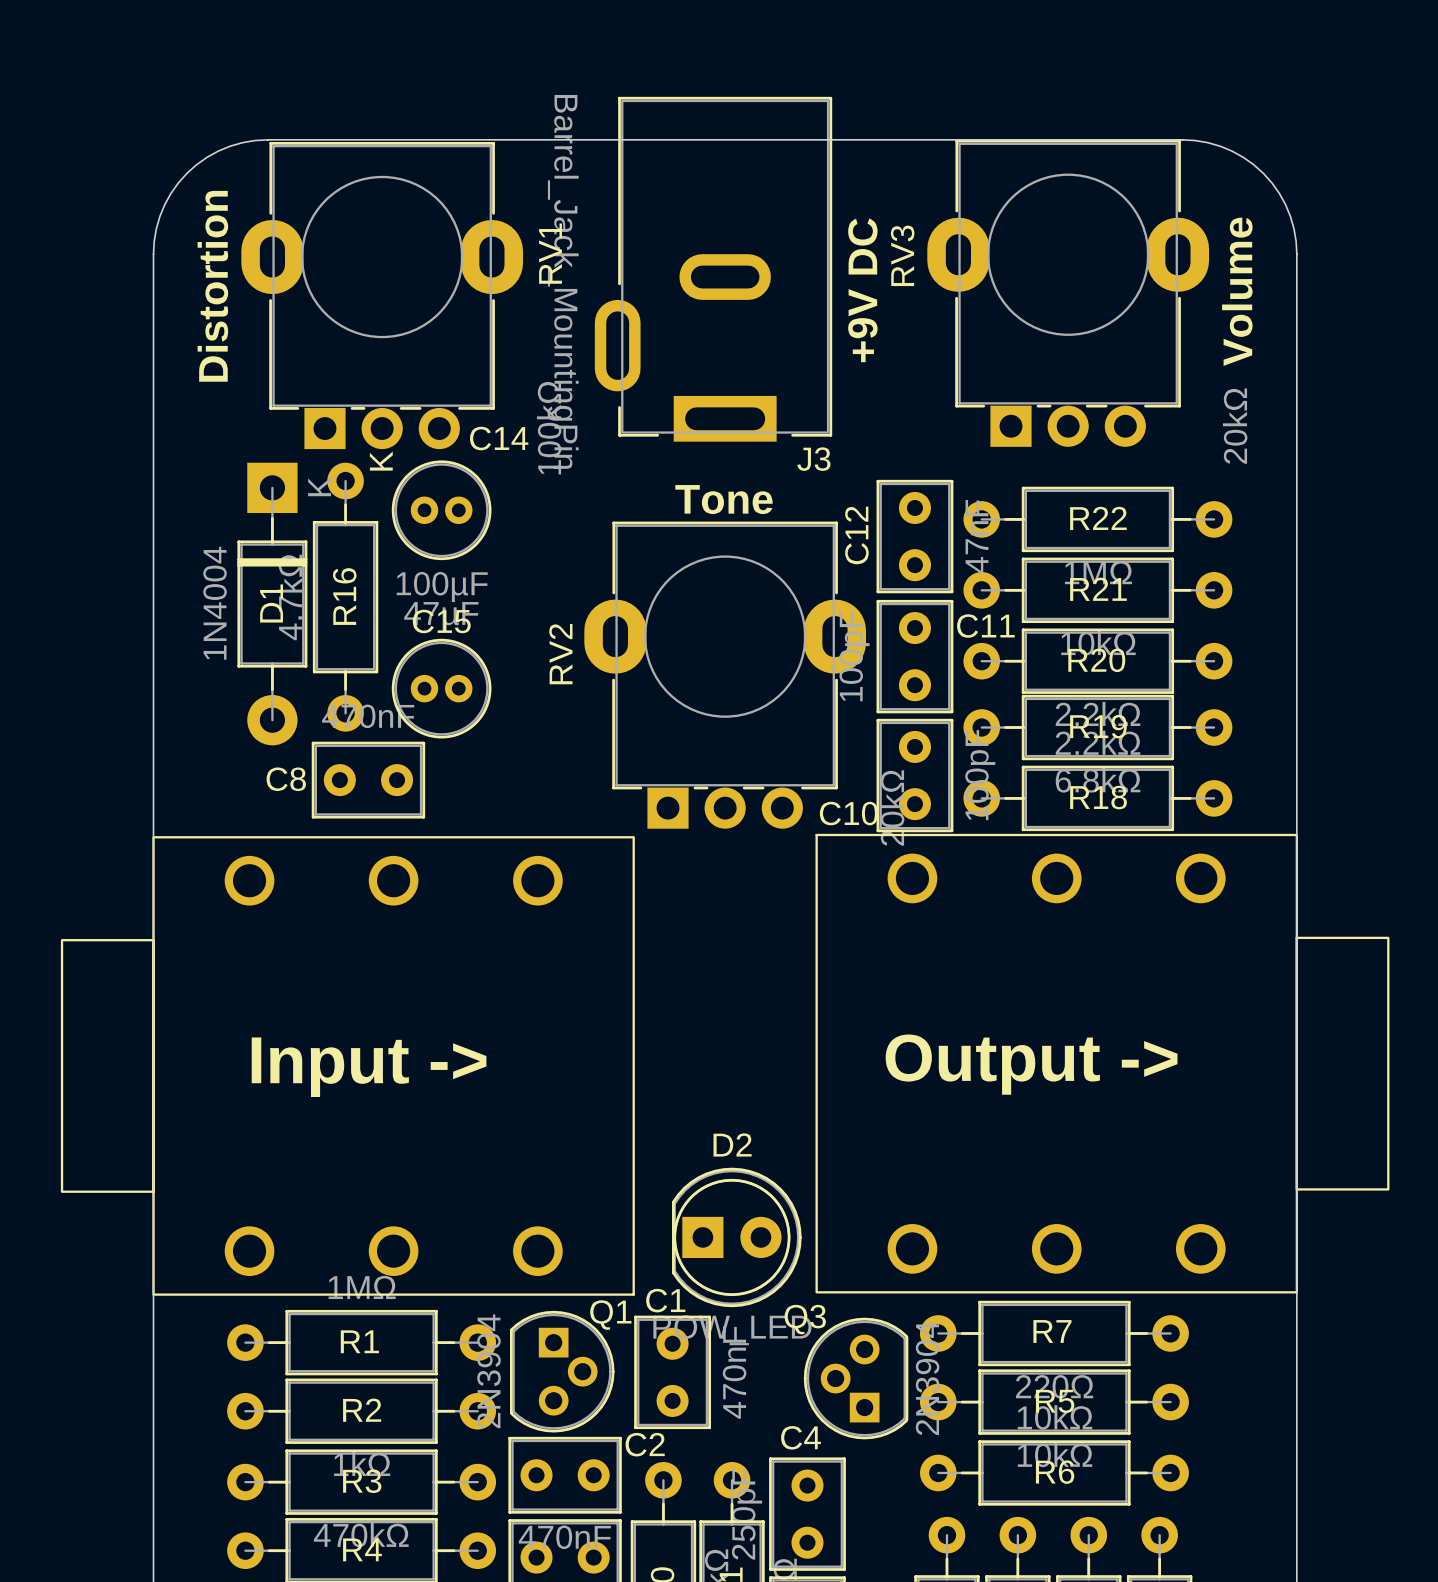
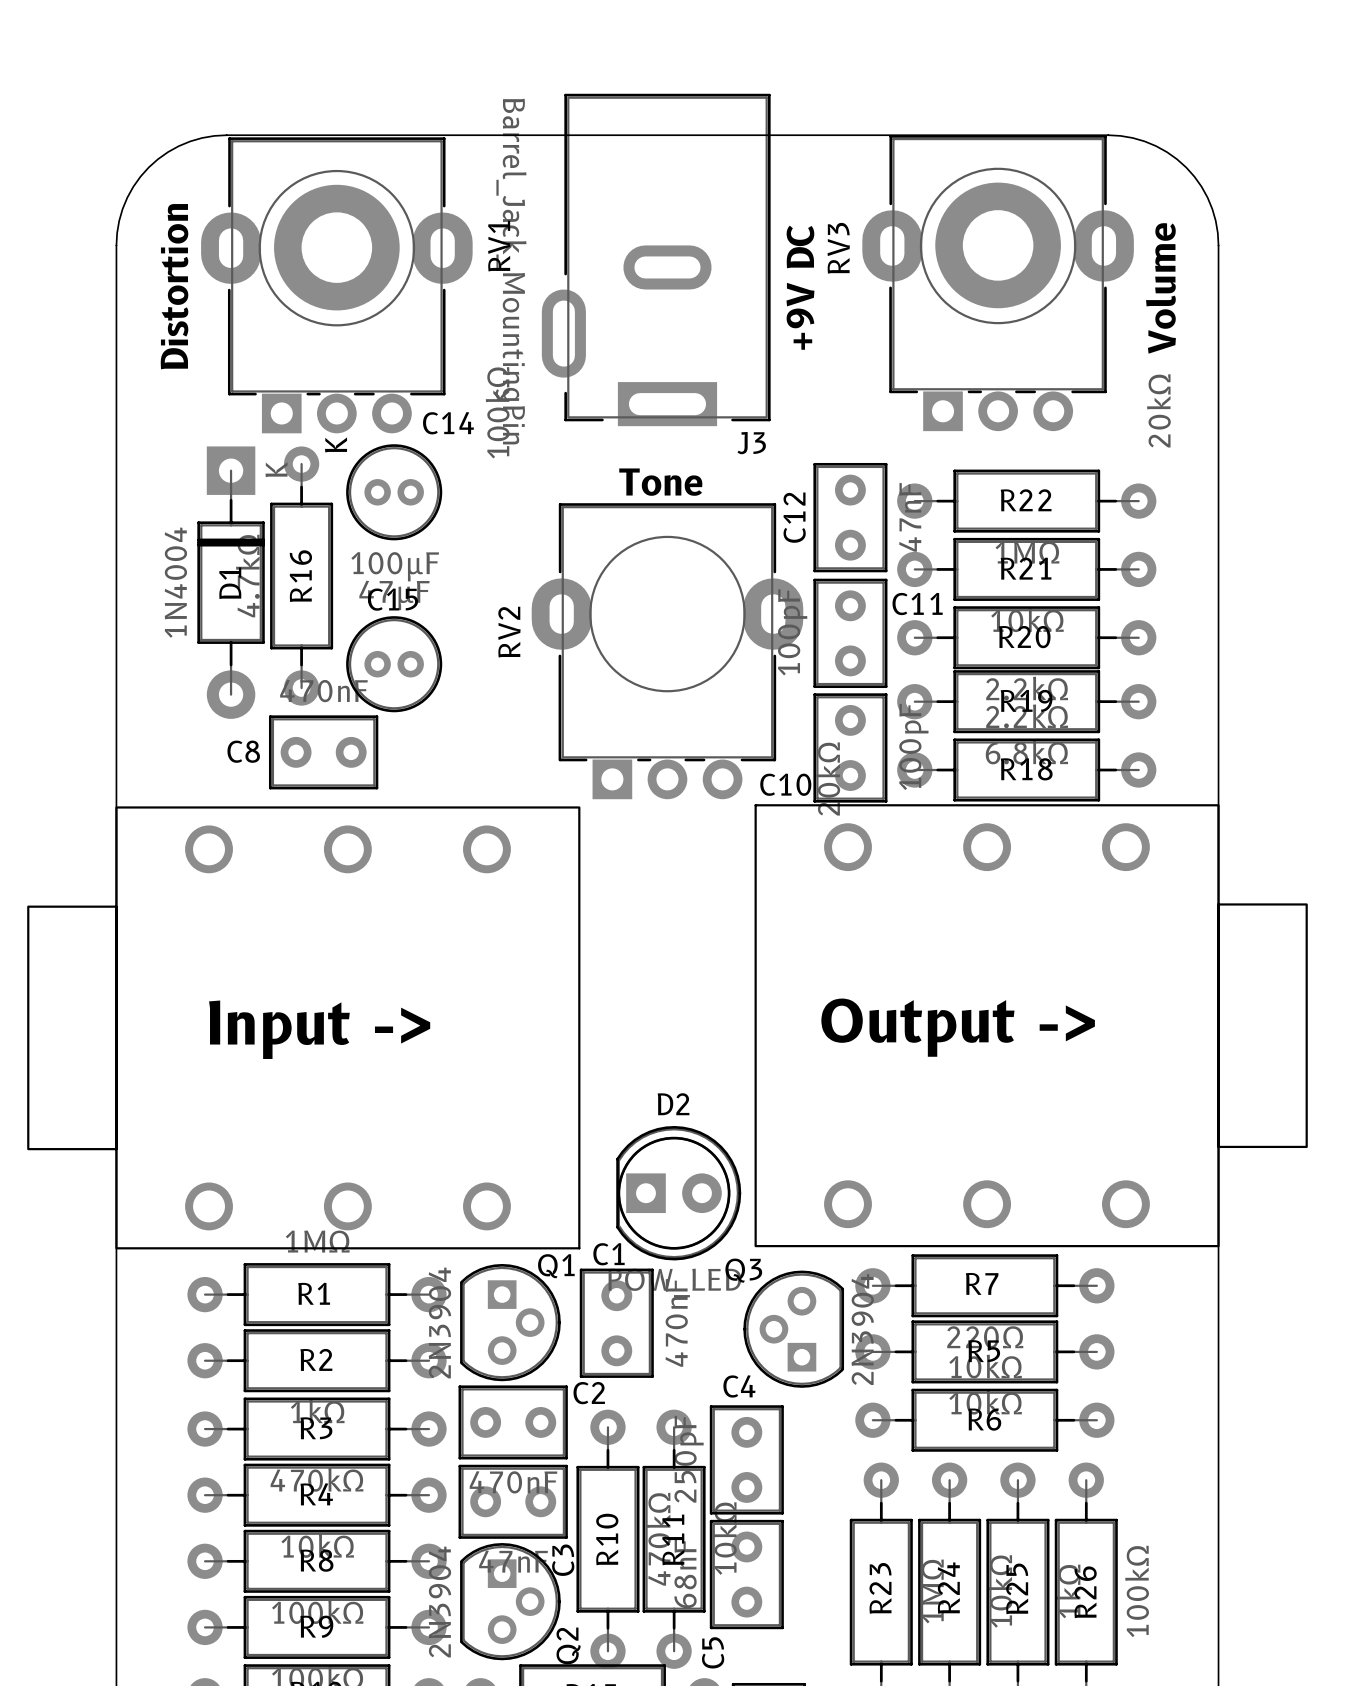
part: none -> (998, 245)
part: none -> (336, 247)

